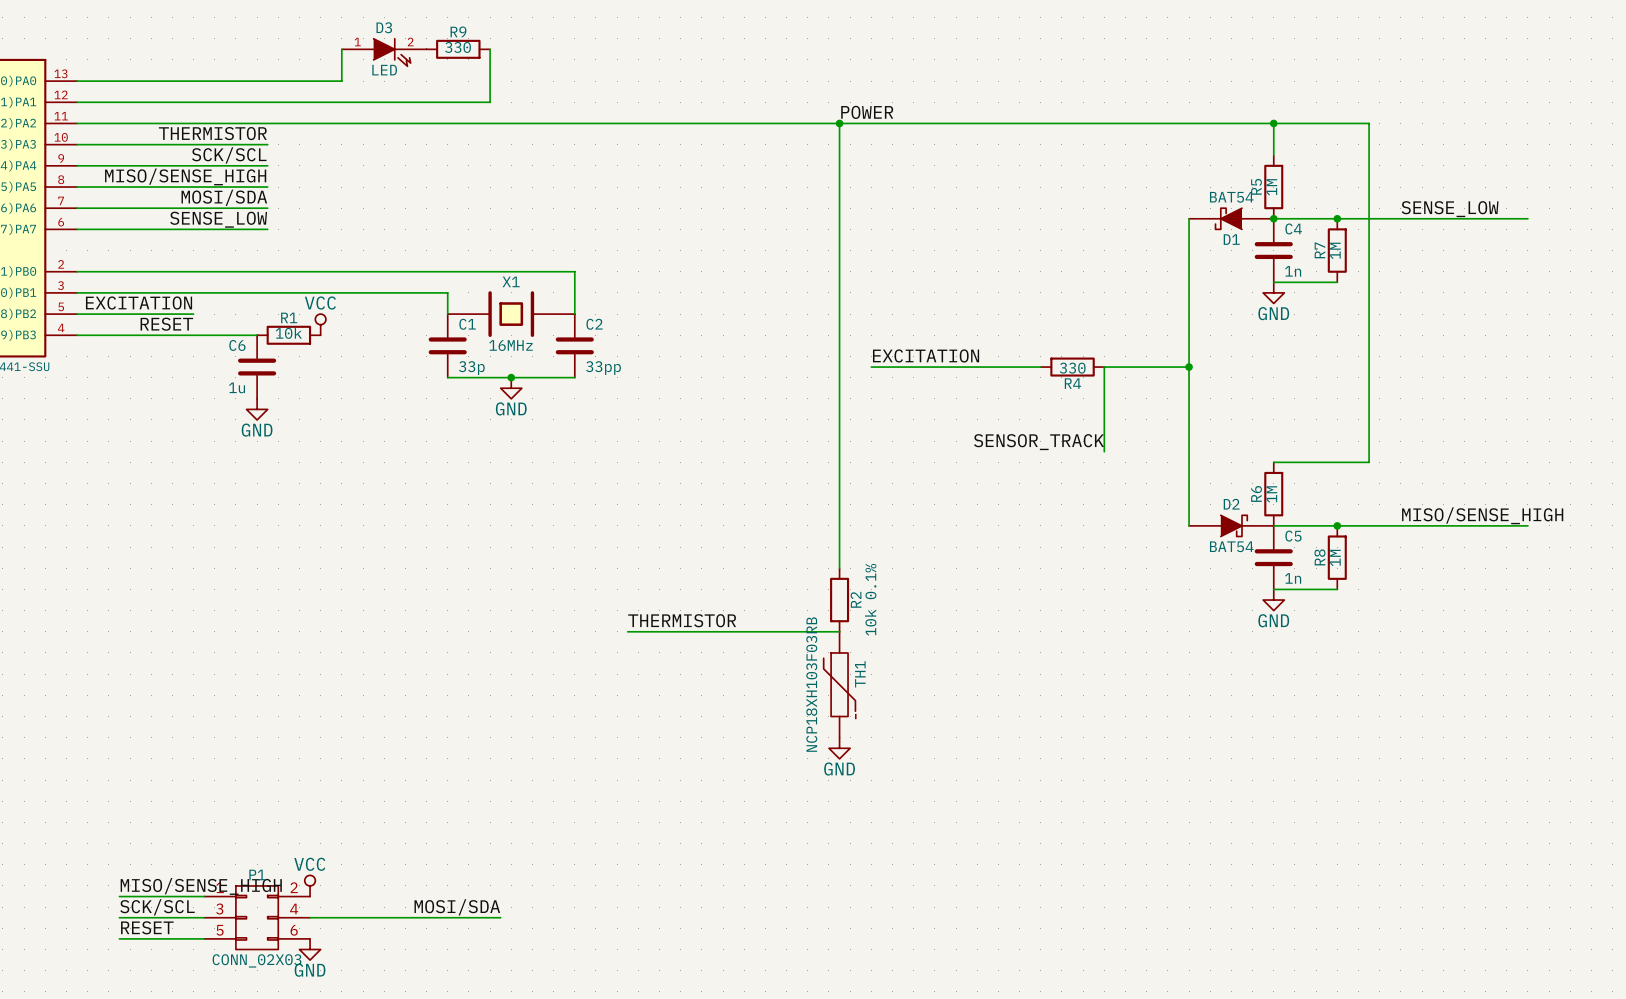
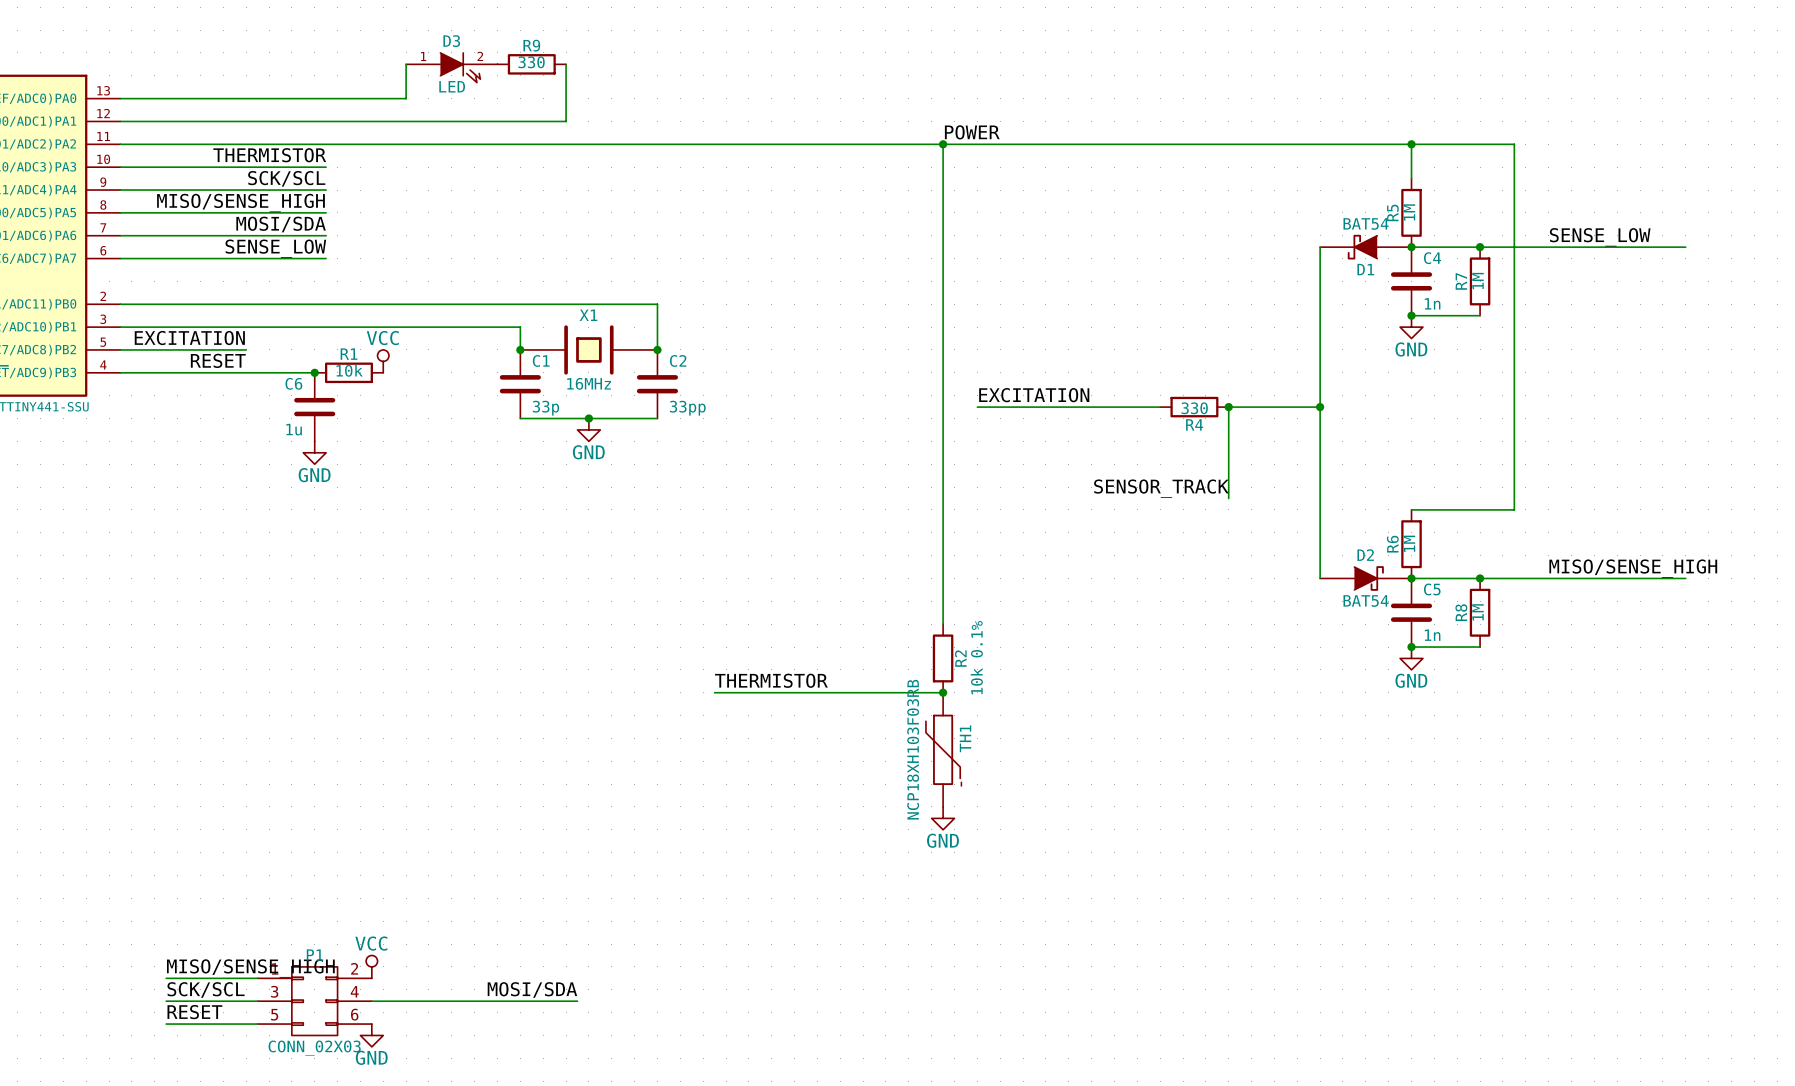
junction: none -> (1411, 315)
junction: none -> (520, 349)
junction: none -> (657, 349)
junction: none -> (314, 372)
junction: none -> (1228, 407)
junction: none -> (1411, 578)
junction: none -> (1411, 647)
junction: none -> (943, 692)

